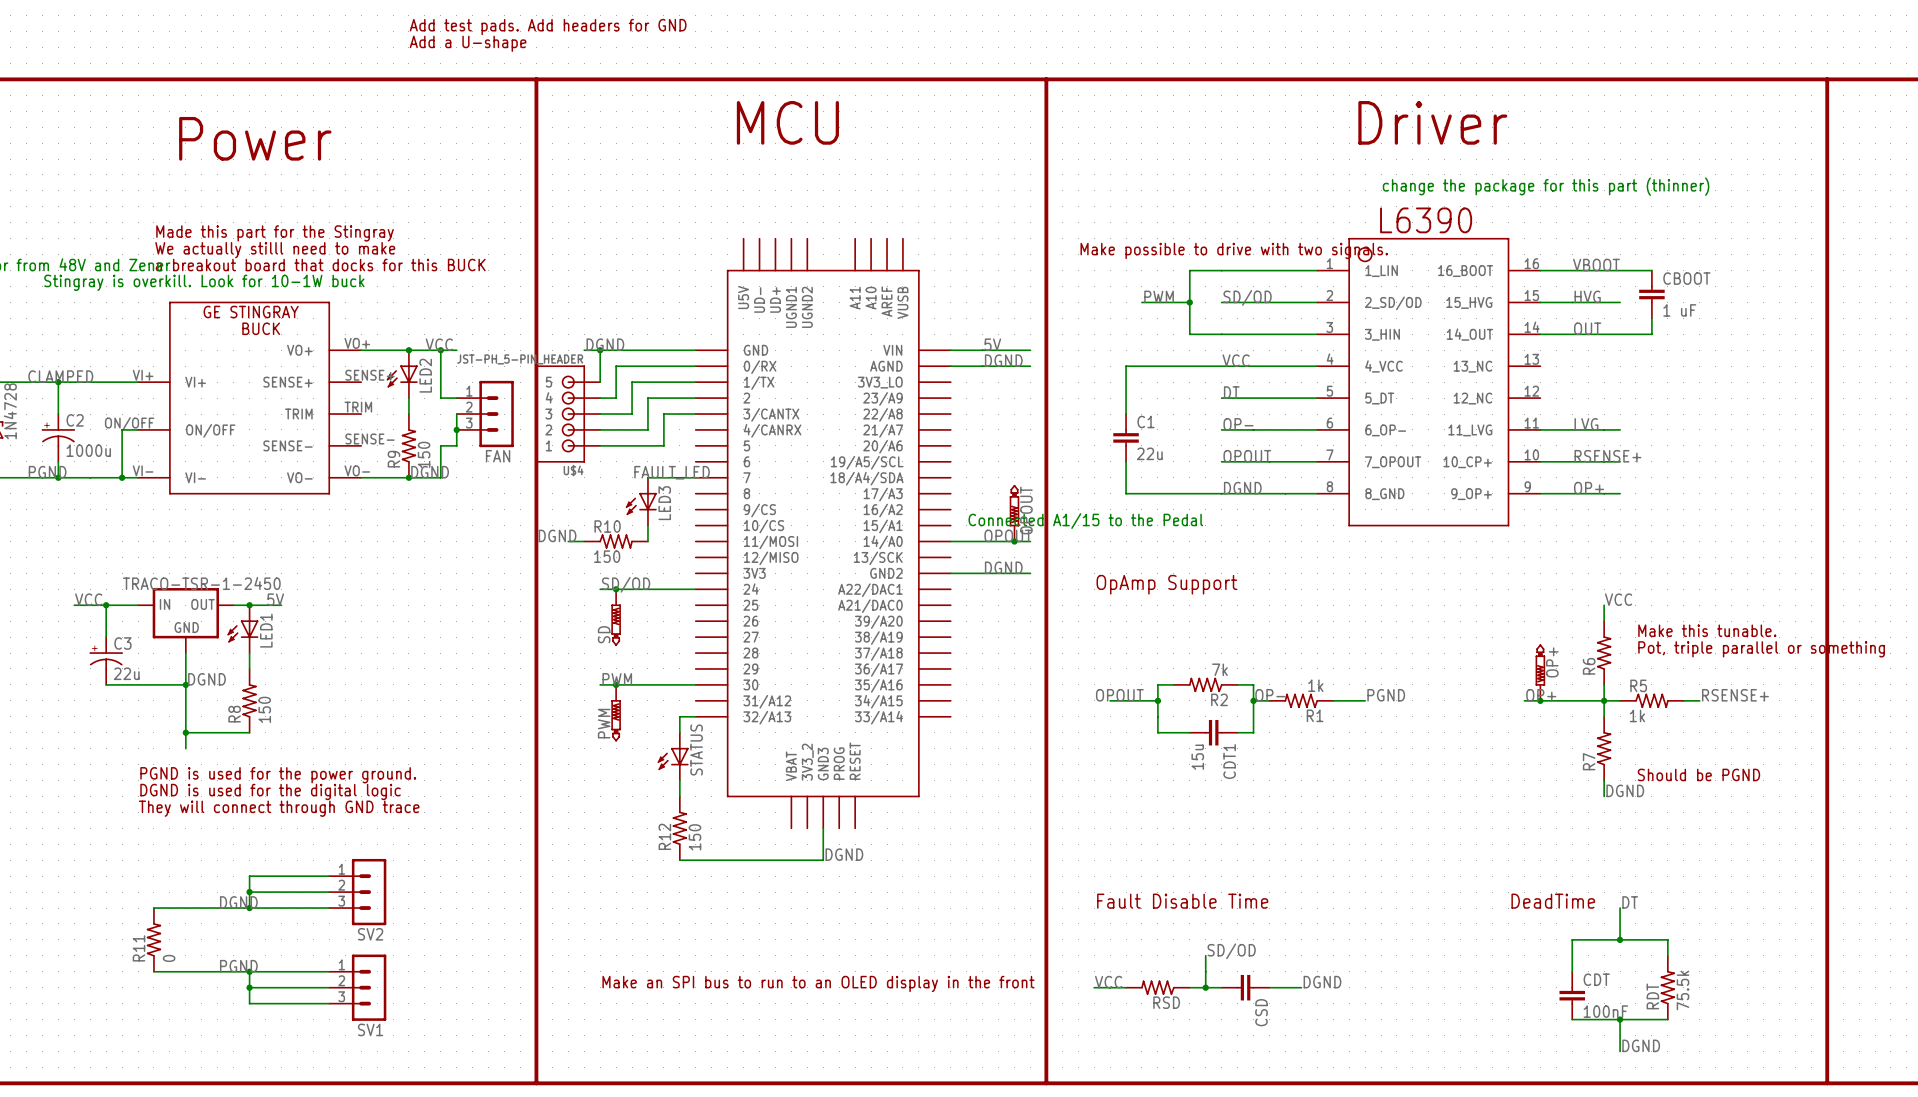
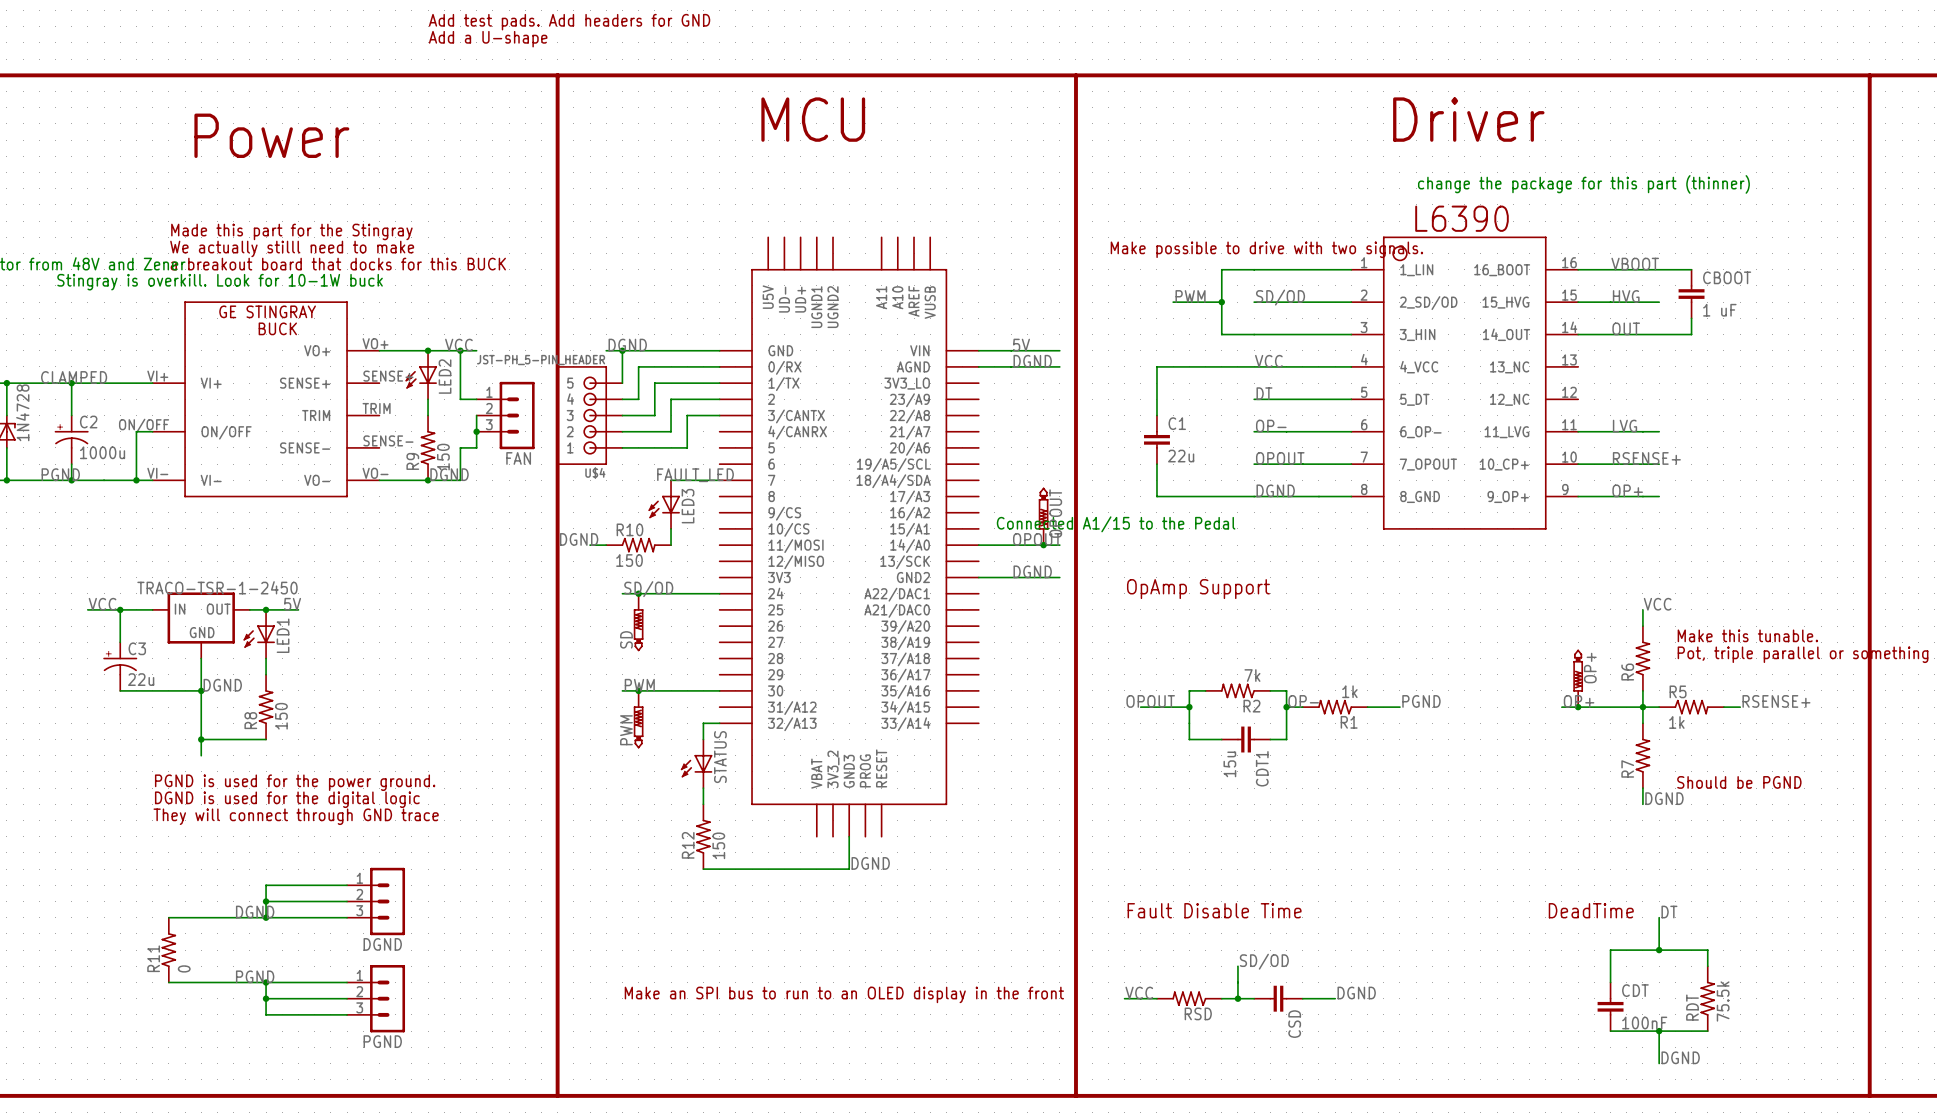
SV2 name: SV2 (370, 934) -> DGND (382, 944)
SV1 name: SV1 (370, 1029) -> PGND (382, 1041)

